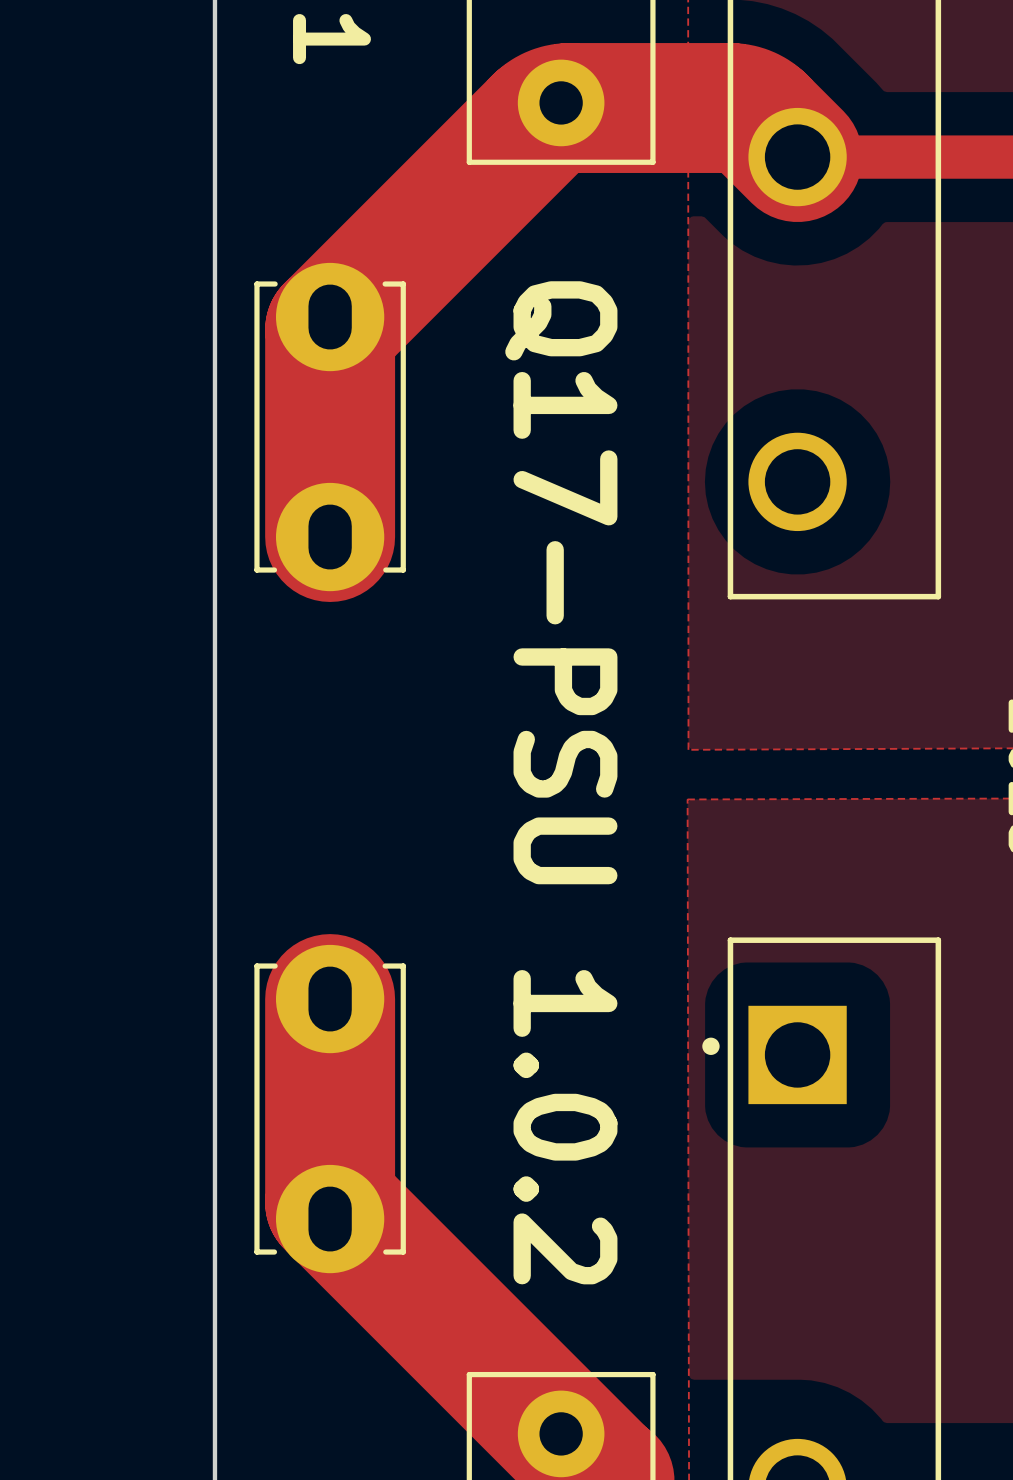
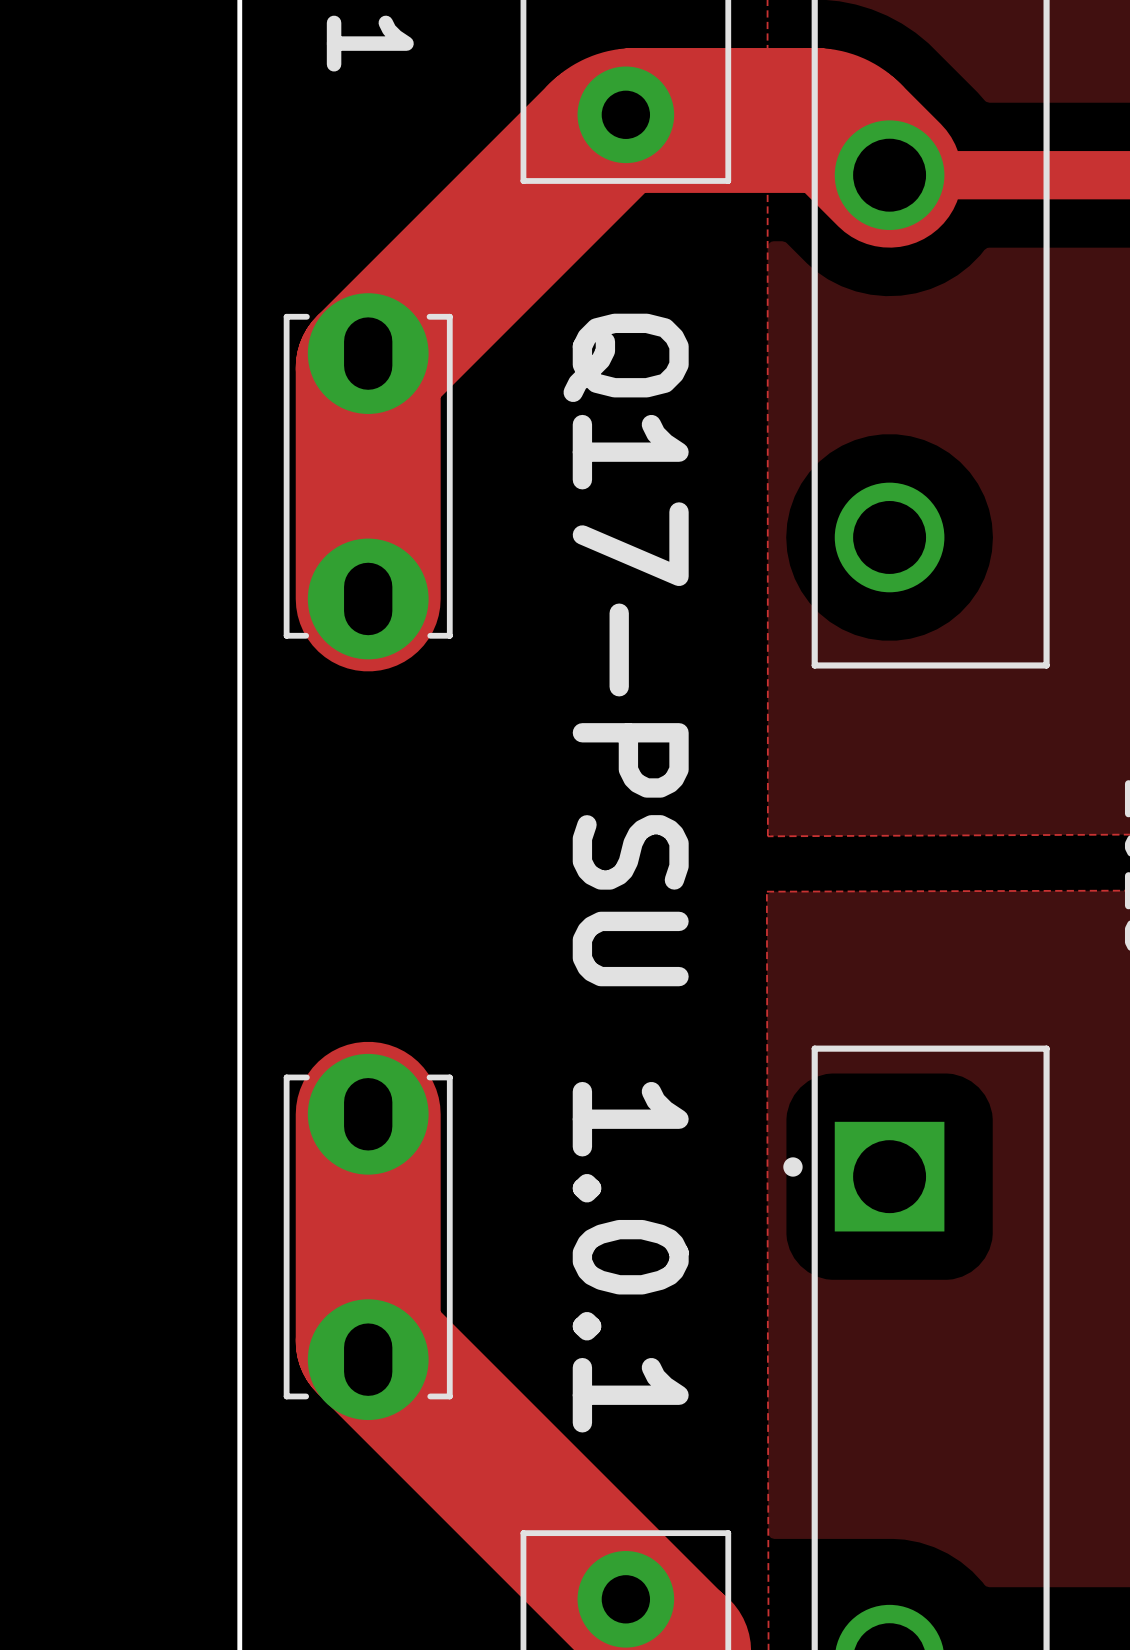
text: Q17-PSU 1.0.2 (561, 782) -> Q17-PSU 1.0.1 (626, 873)

